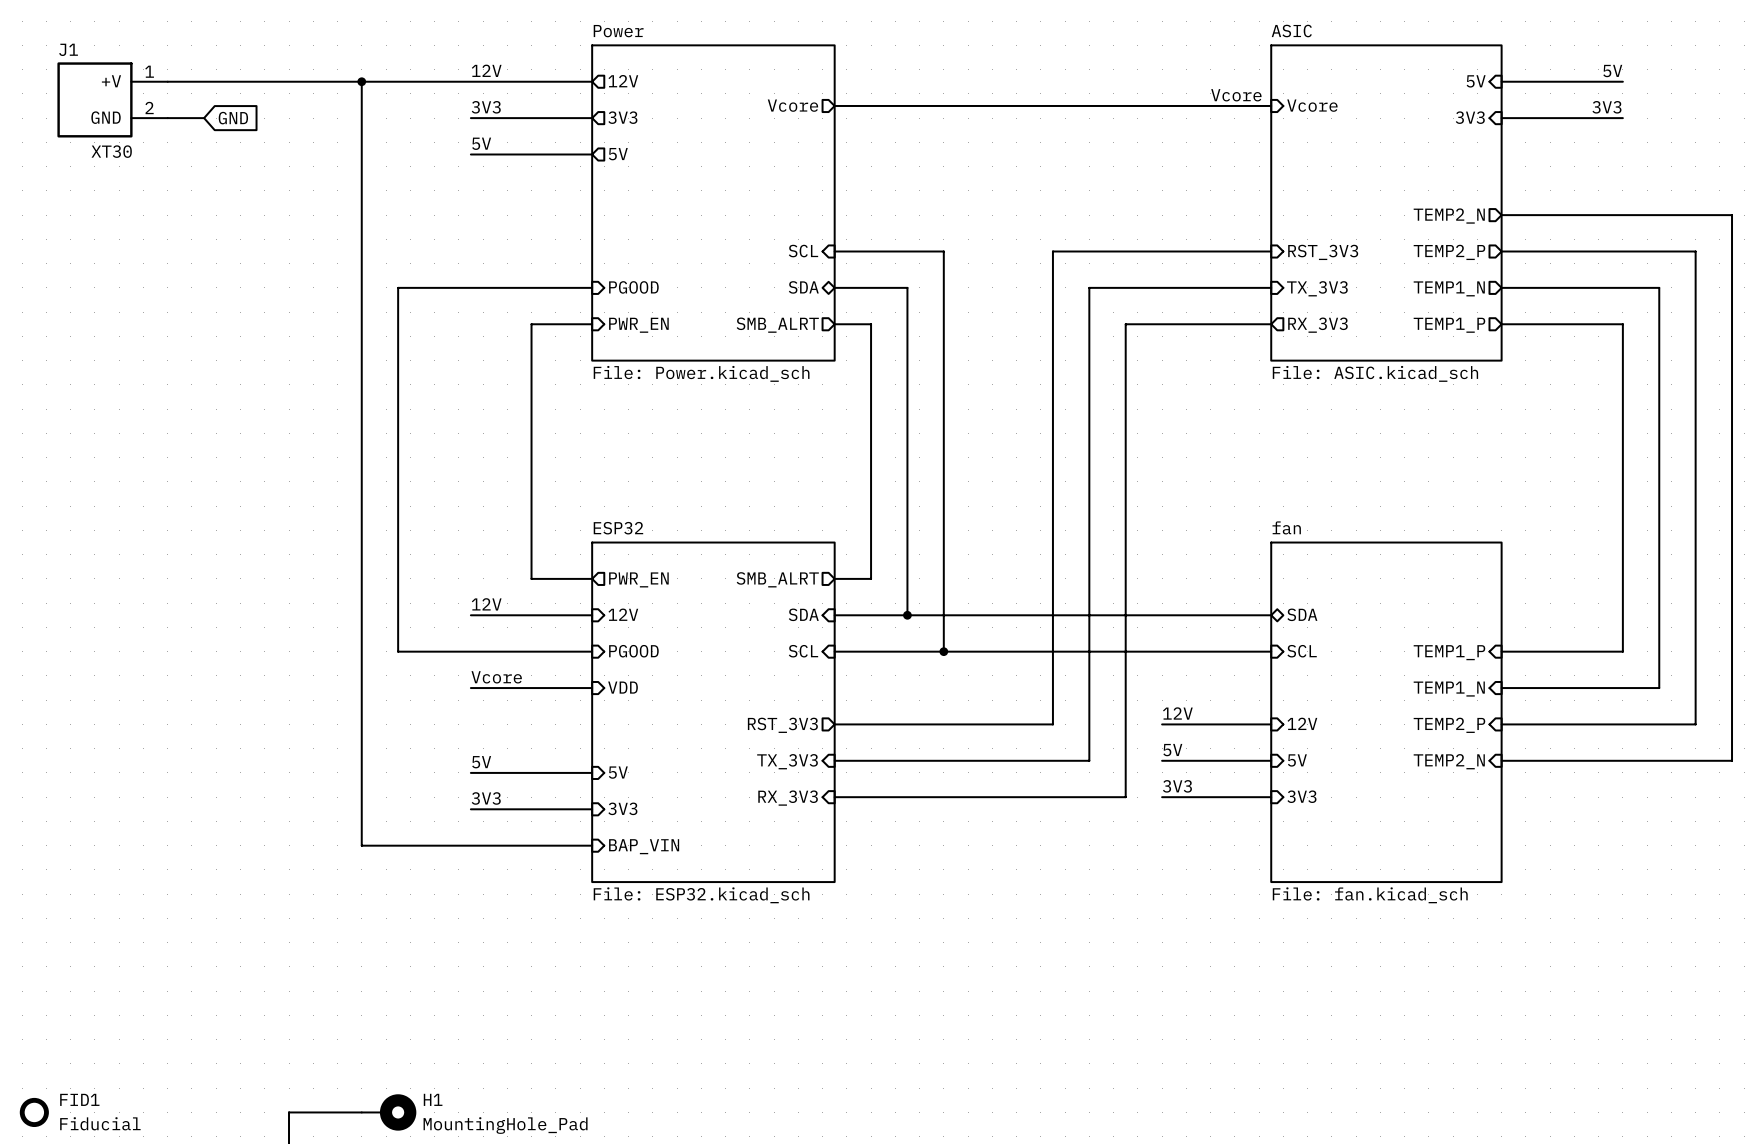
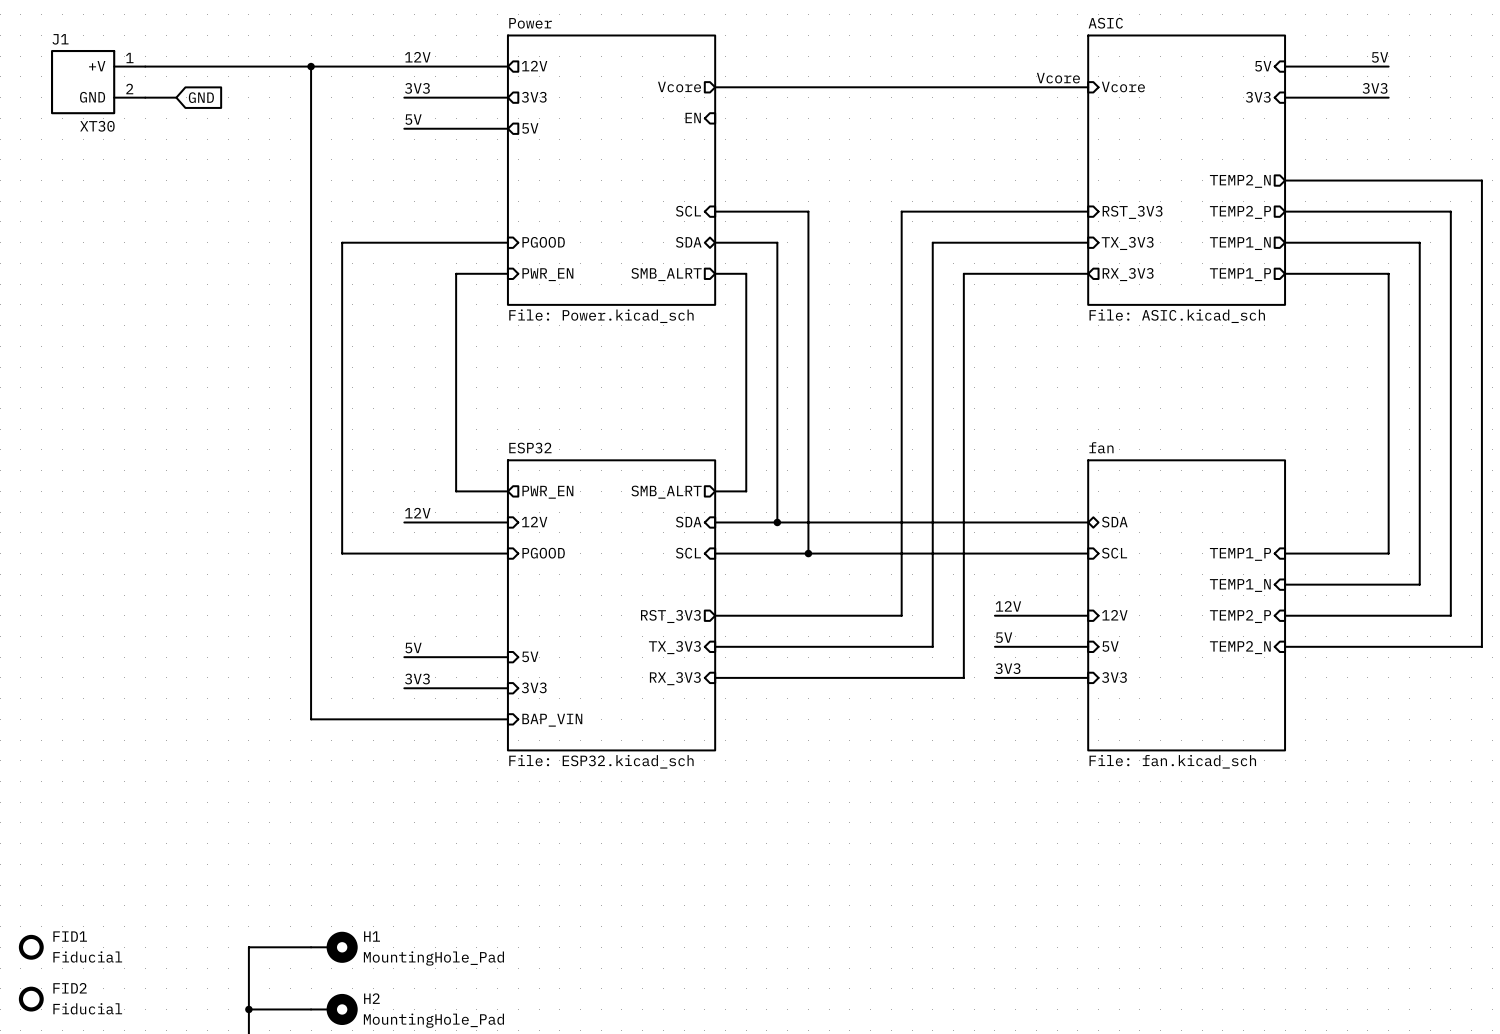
sheet pin: none -> EN (693, 117)
label: Vcore (496, 677) -> none
sheet pin: VDD (623, 687) -> none
wire: (470, 688) (592, 688) -> none

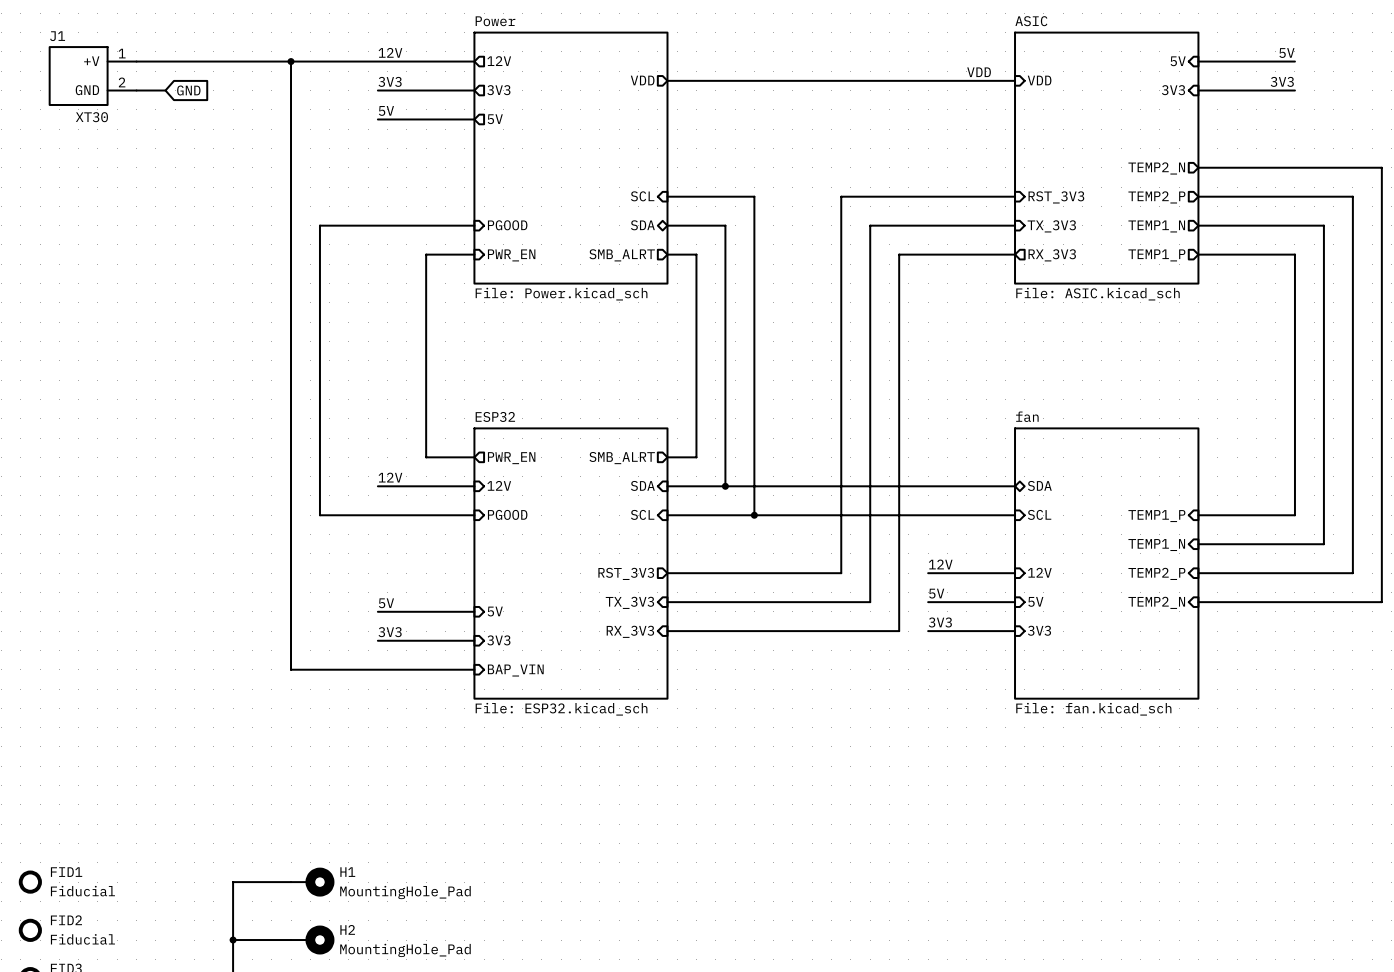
label: Vcore (1058, 78) -> VDD (979, 72)
sheet pin: Vcore (679, 86) -> VDD (642, 80)
sheet pin: Vcore (1123, 86) -> VDD (1039, 80)
sheet pin: EN (693, 117) -> none

